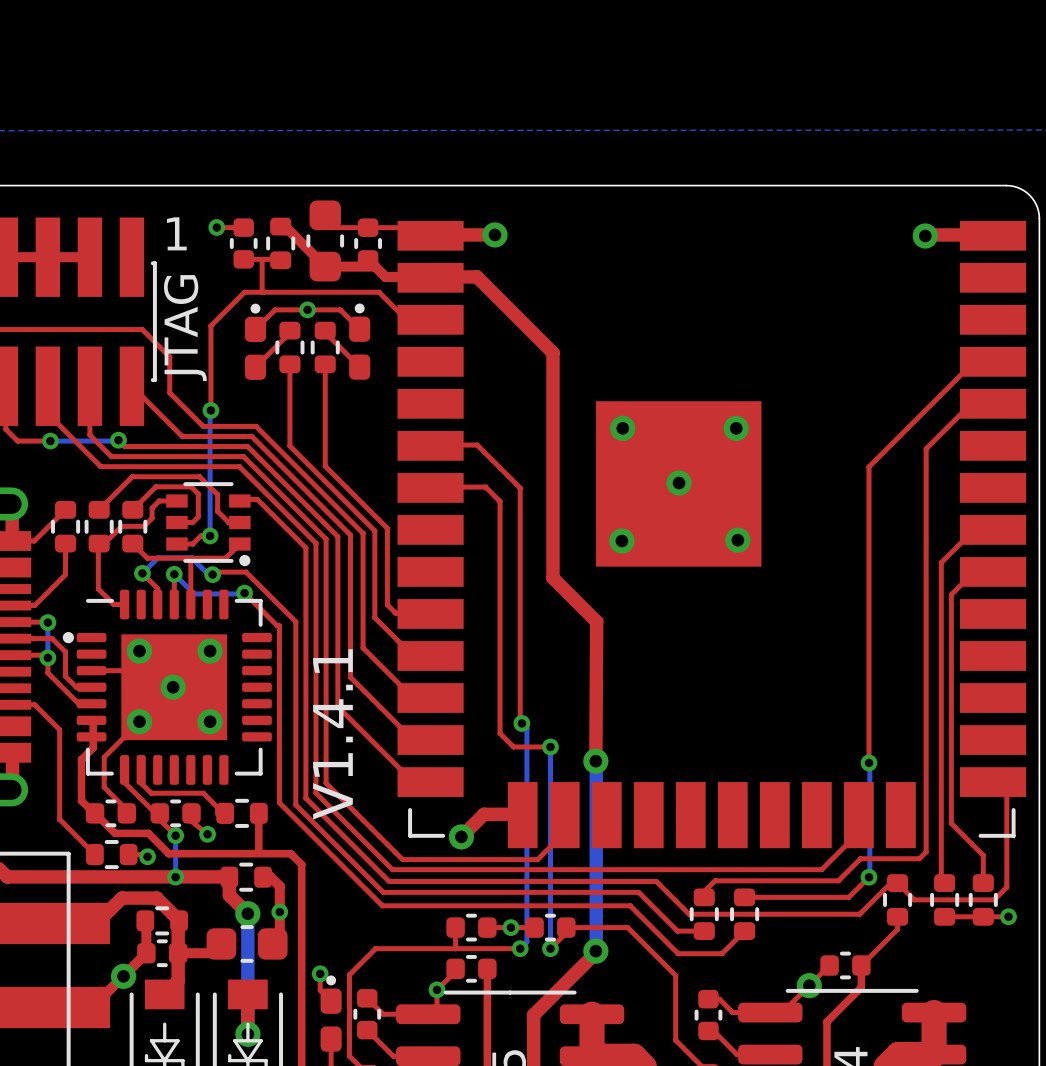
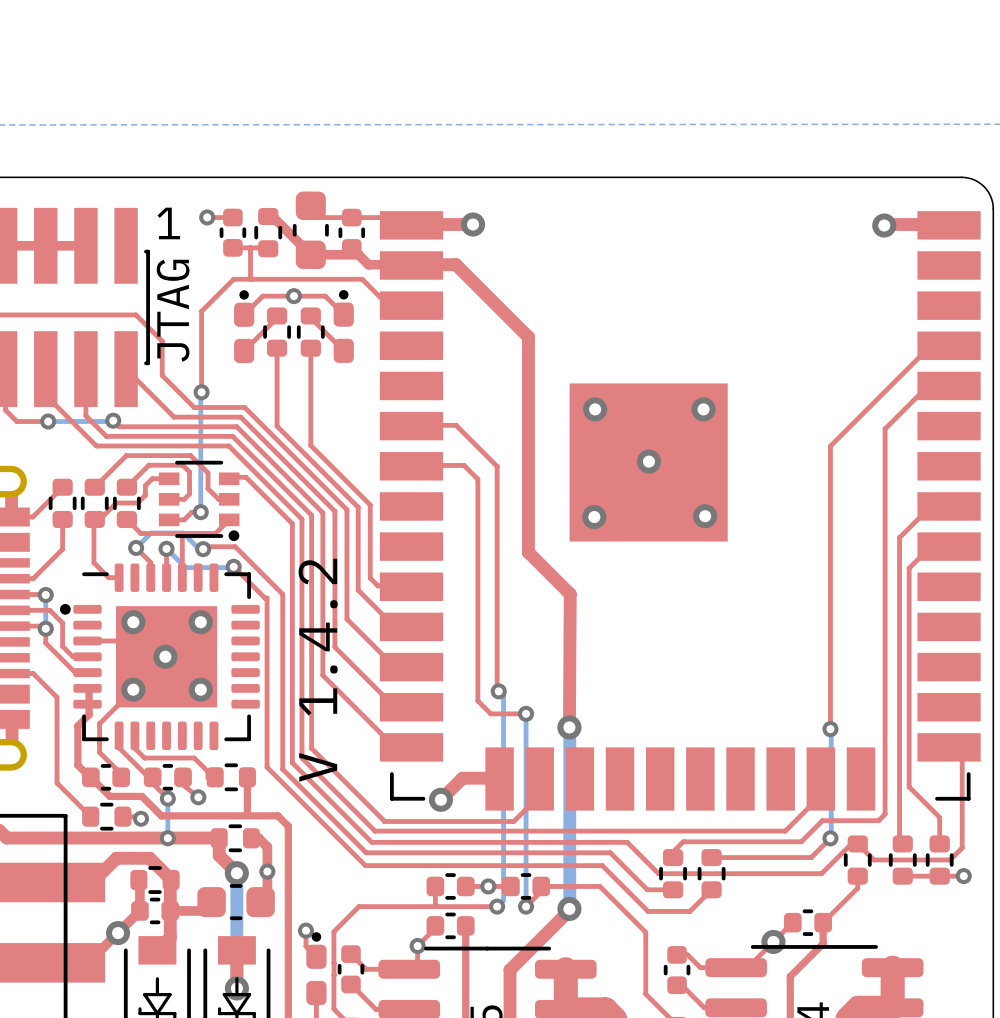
text: V1.4.1 (332, 734) -> V 1.4.2 (318, 670)

